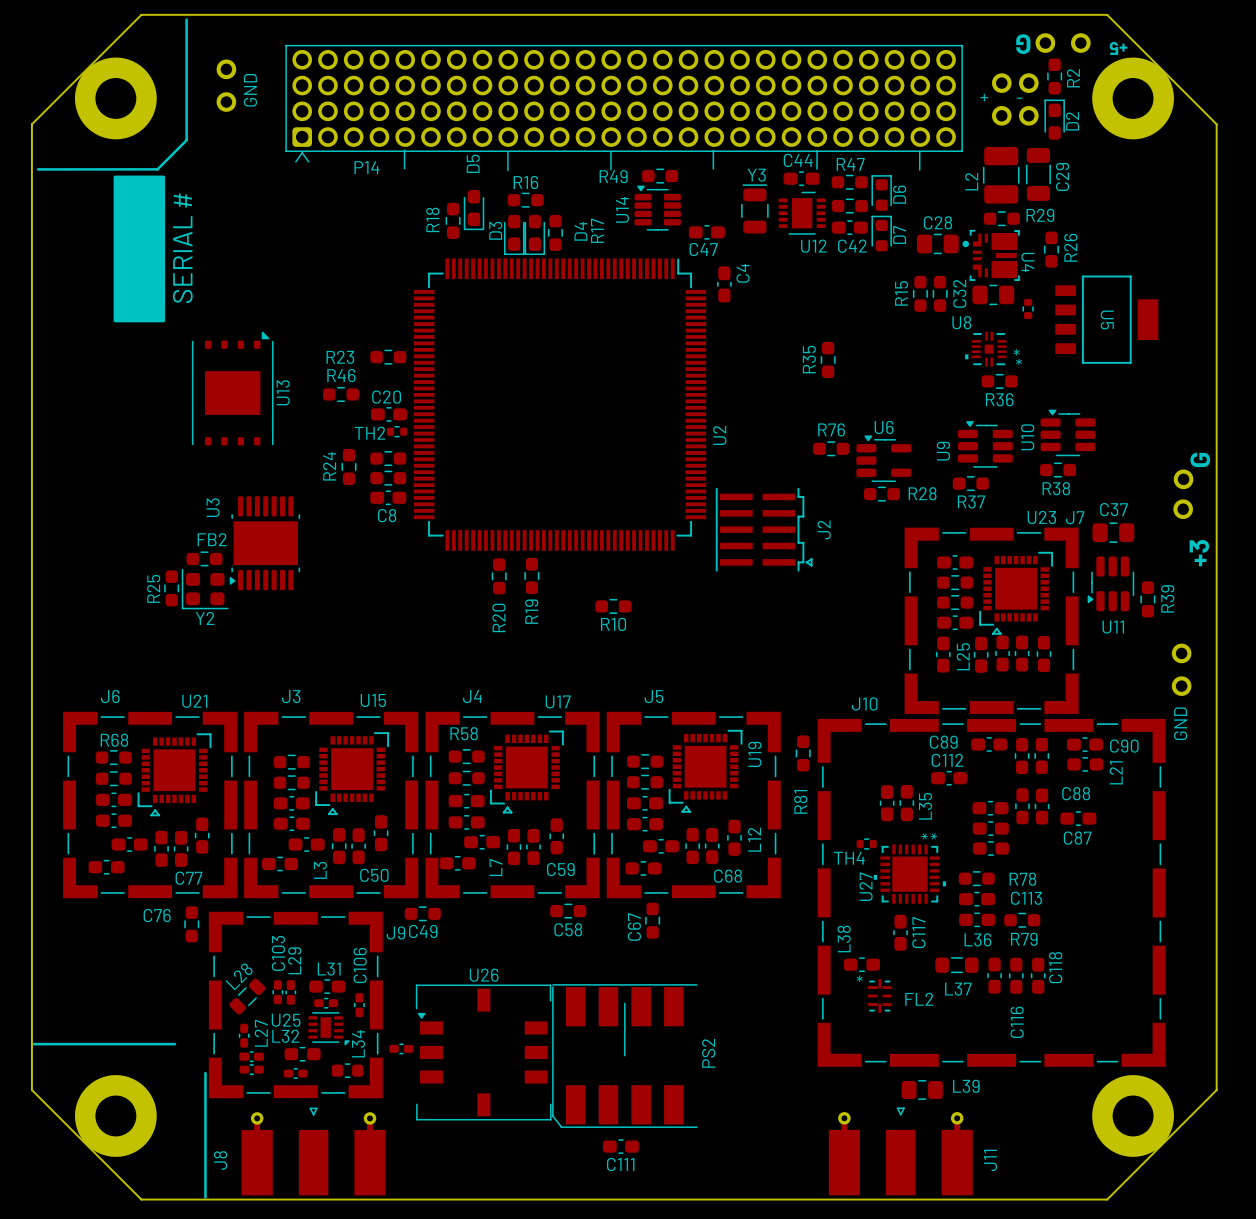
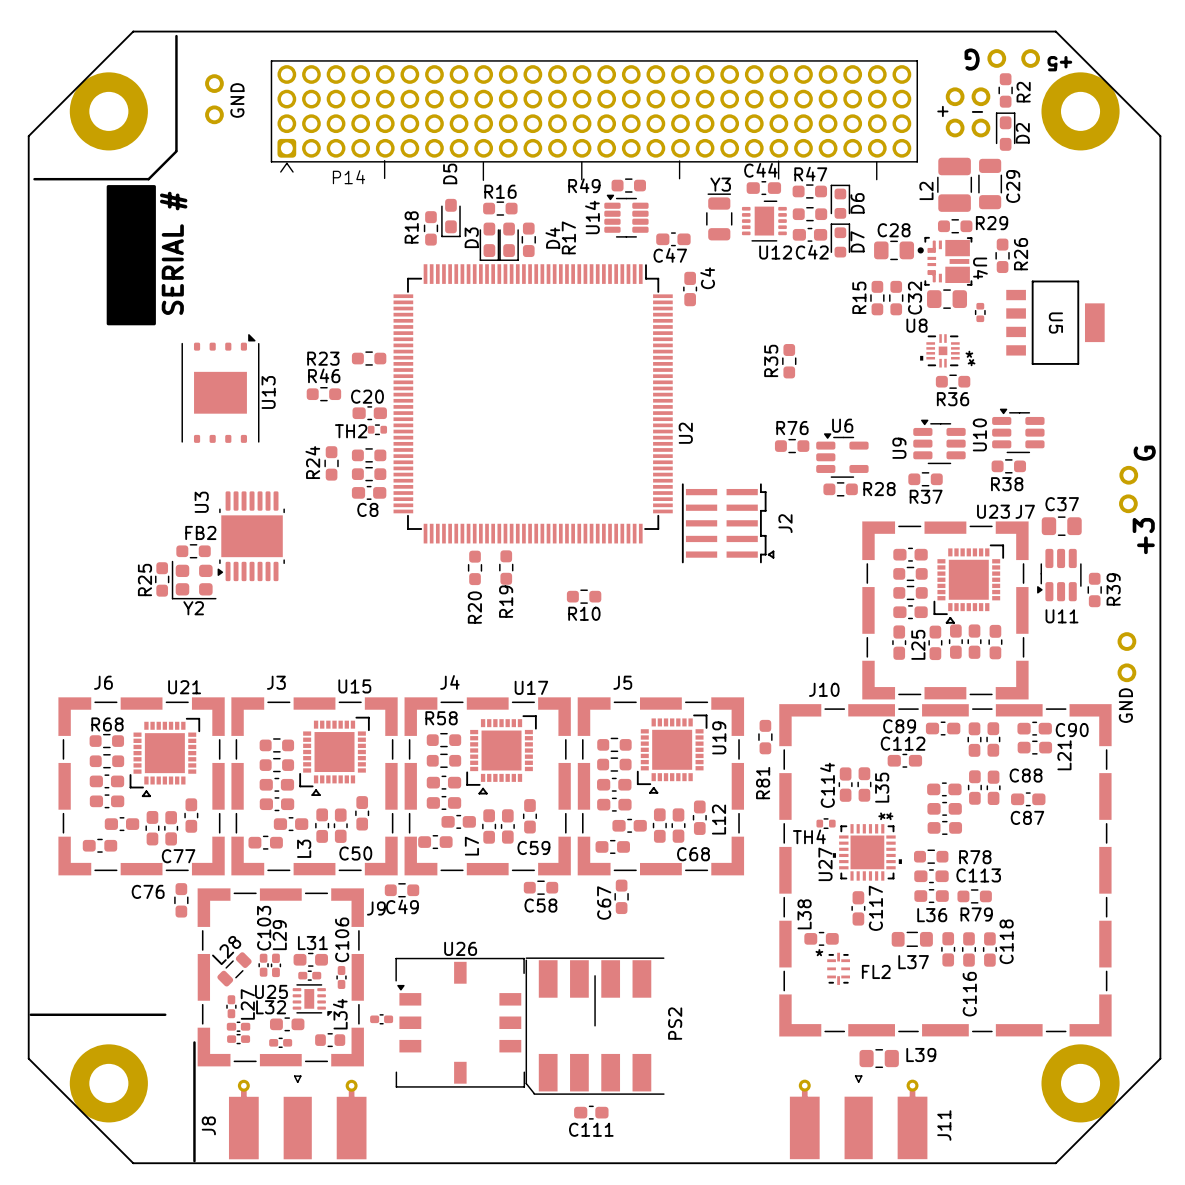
C114 name: none -> C114 (827, 785)

